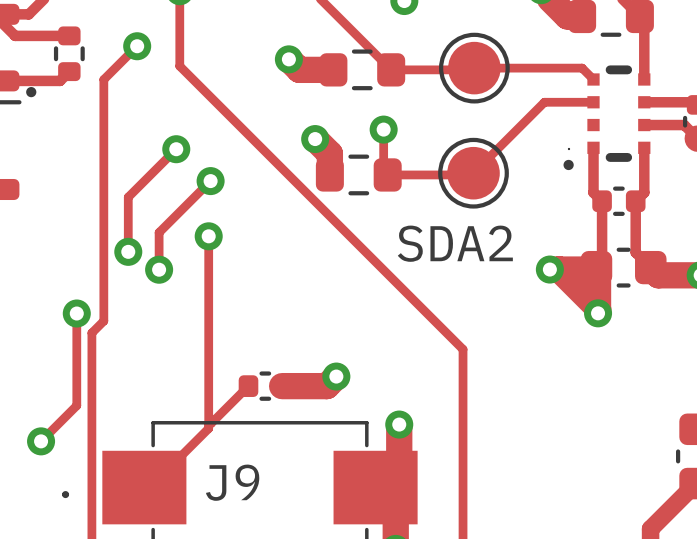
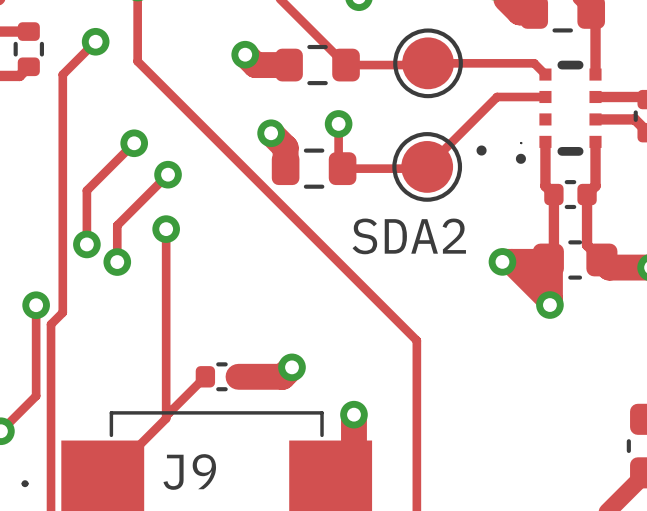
drawing: none -> [476, 145, 487, 156]

